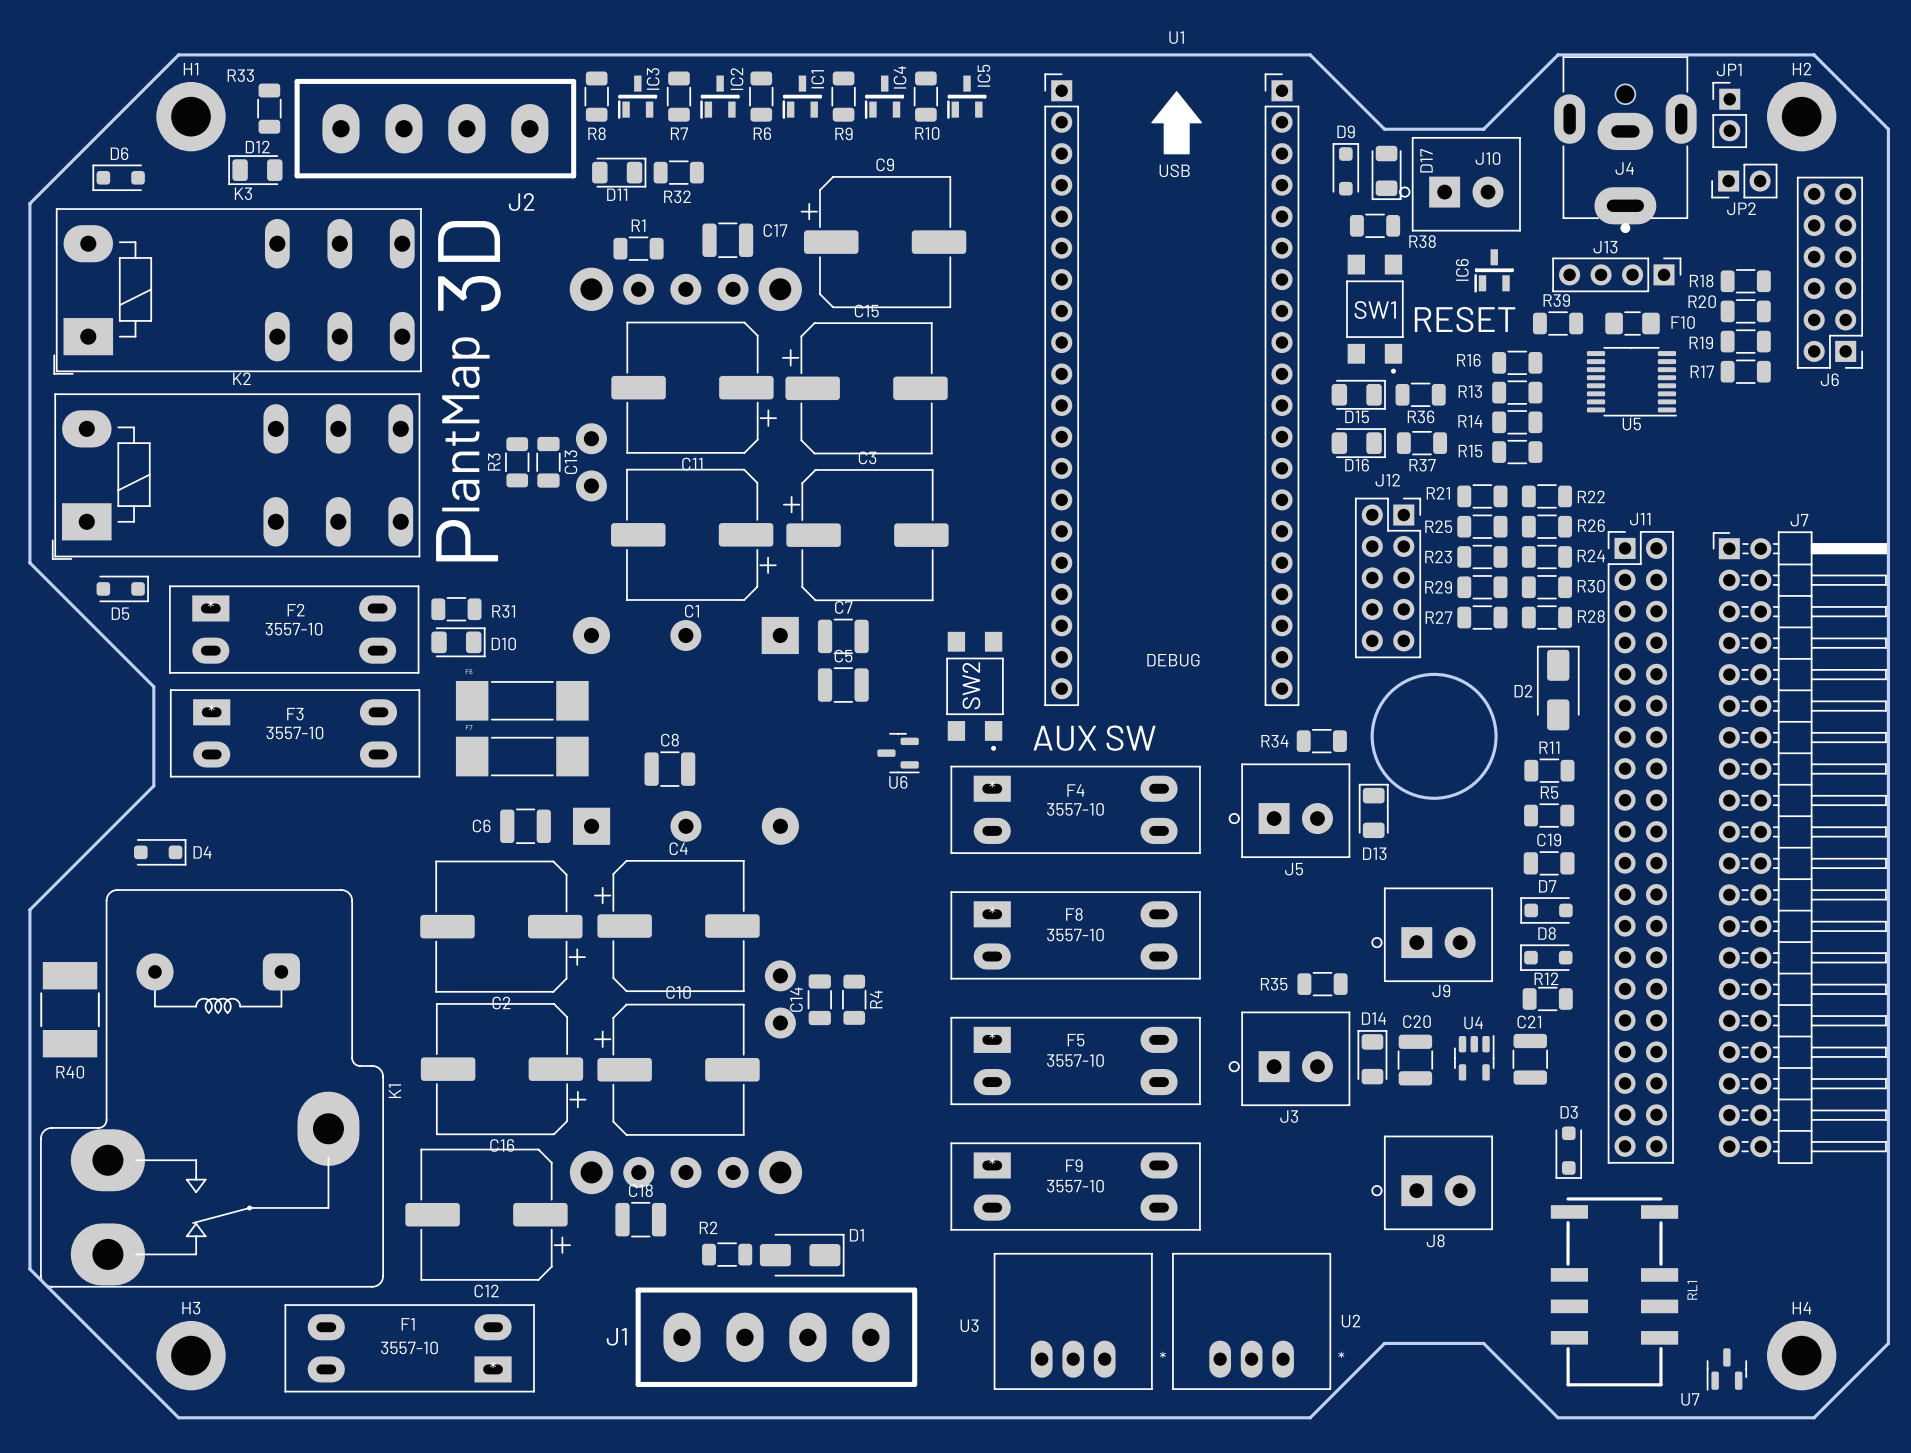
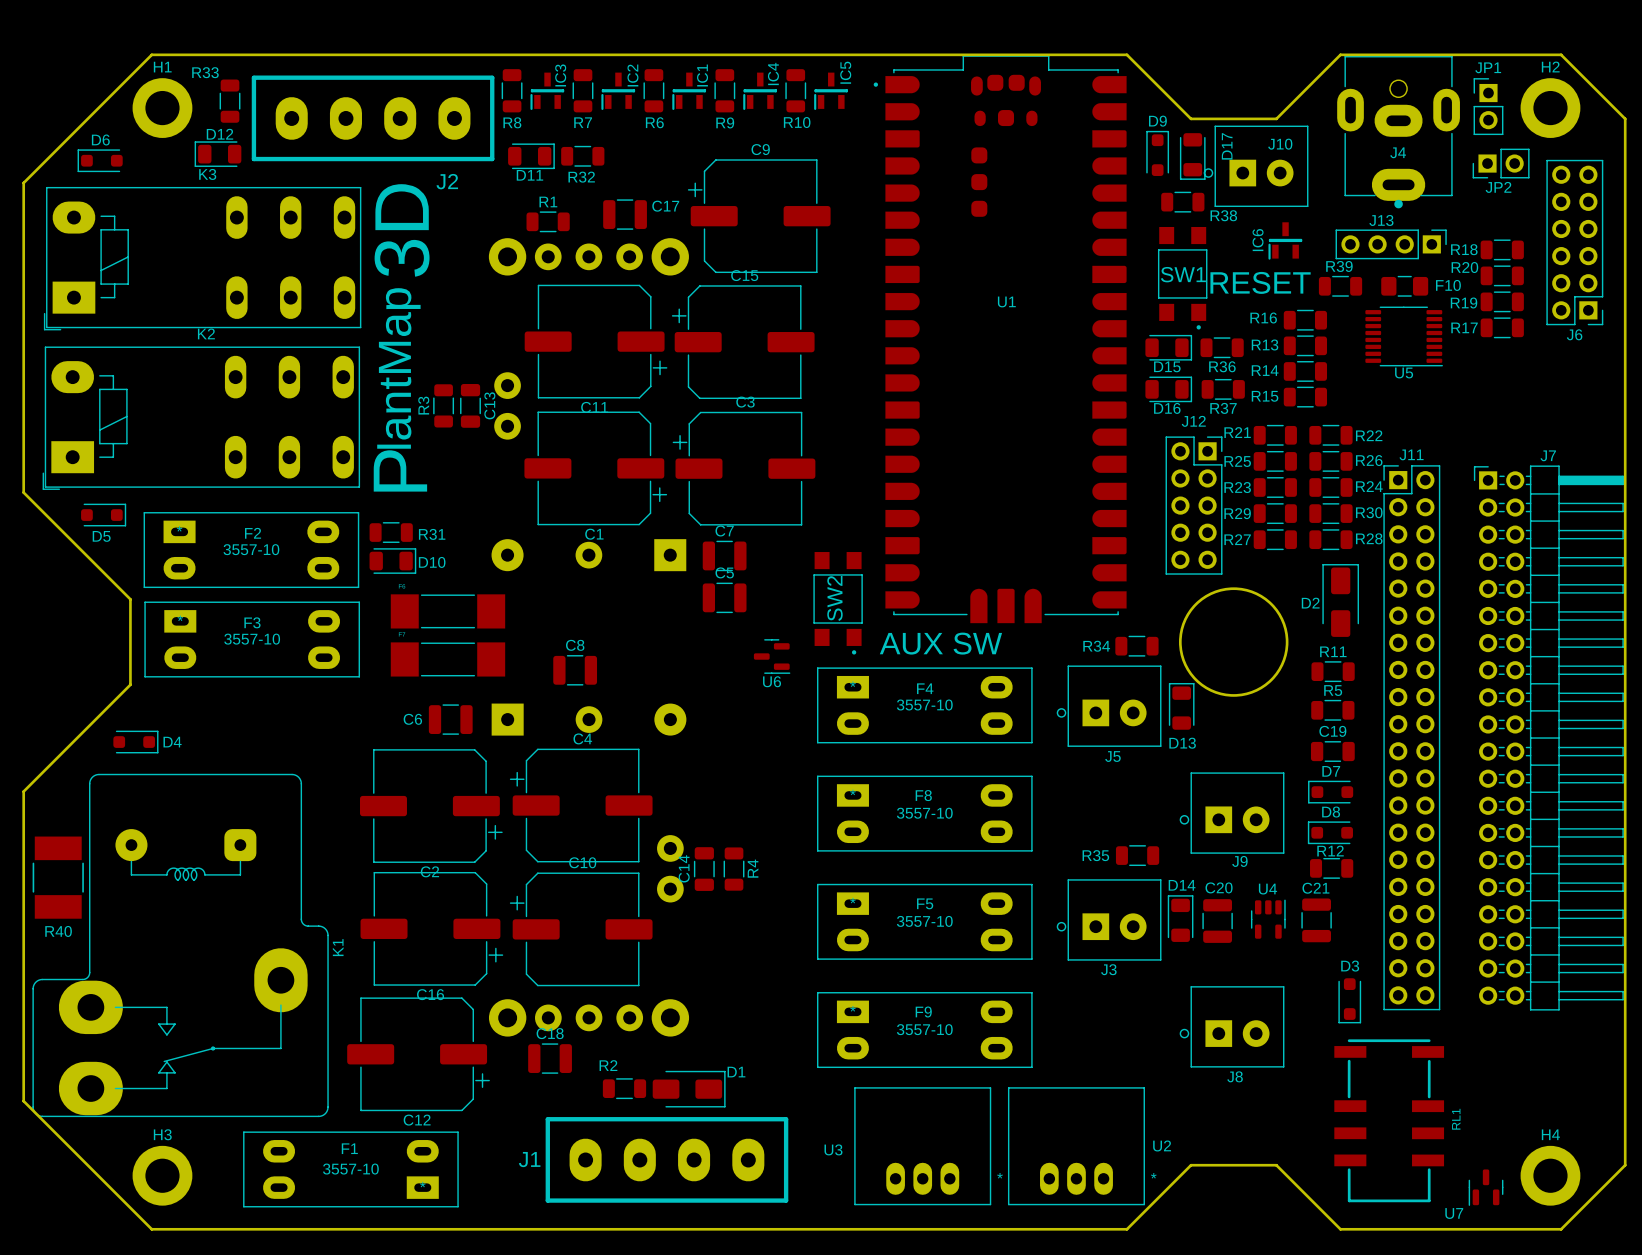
U1 name position: U1 (1176, 37) -> U1 (1006, 301)
U1 footprint: [1044, 73, 1300, 706] -> [873, 55, 1127, 624]

